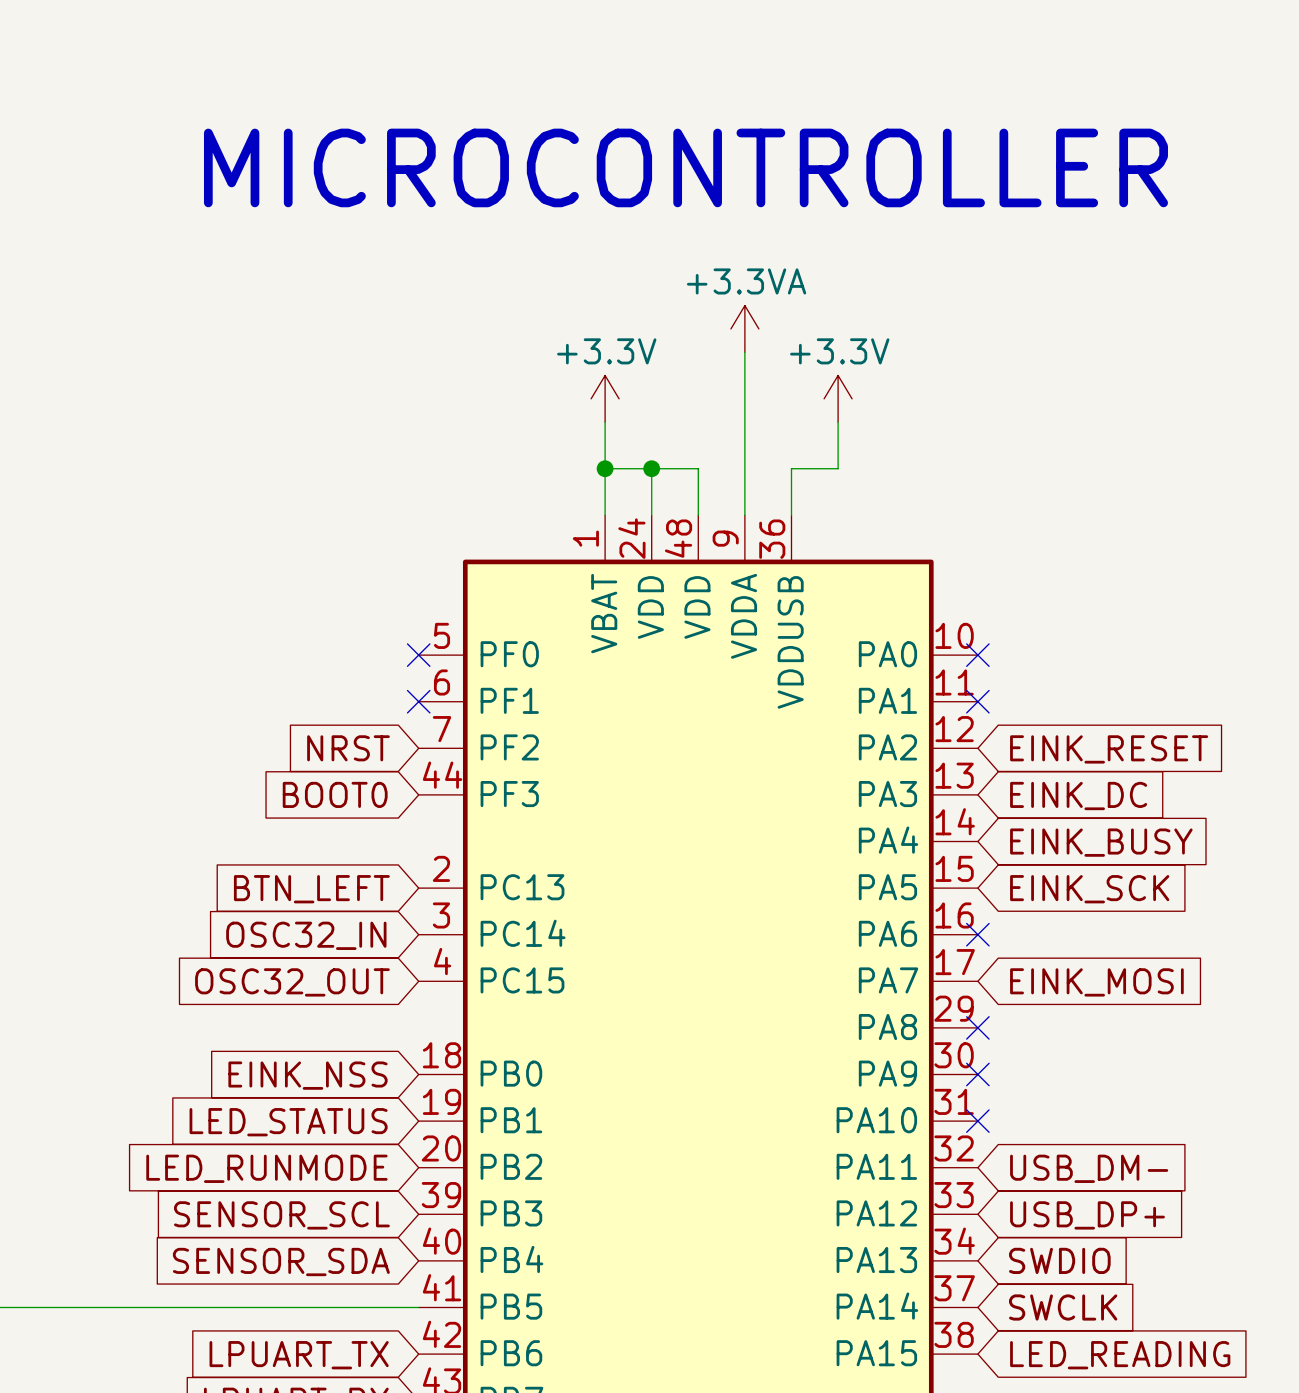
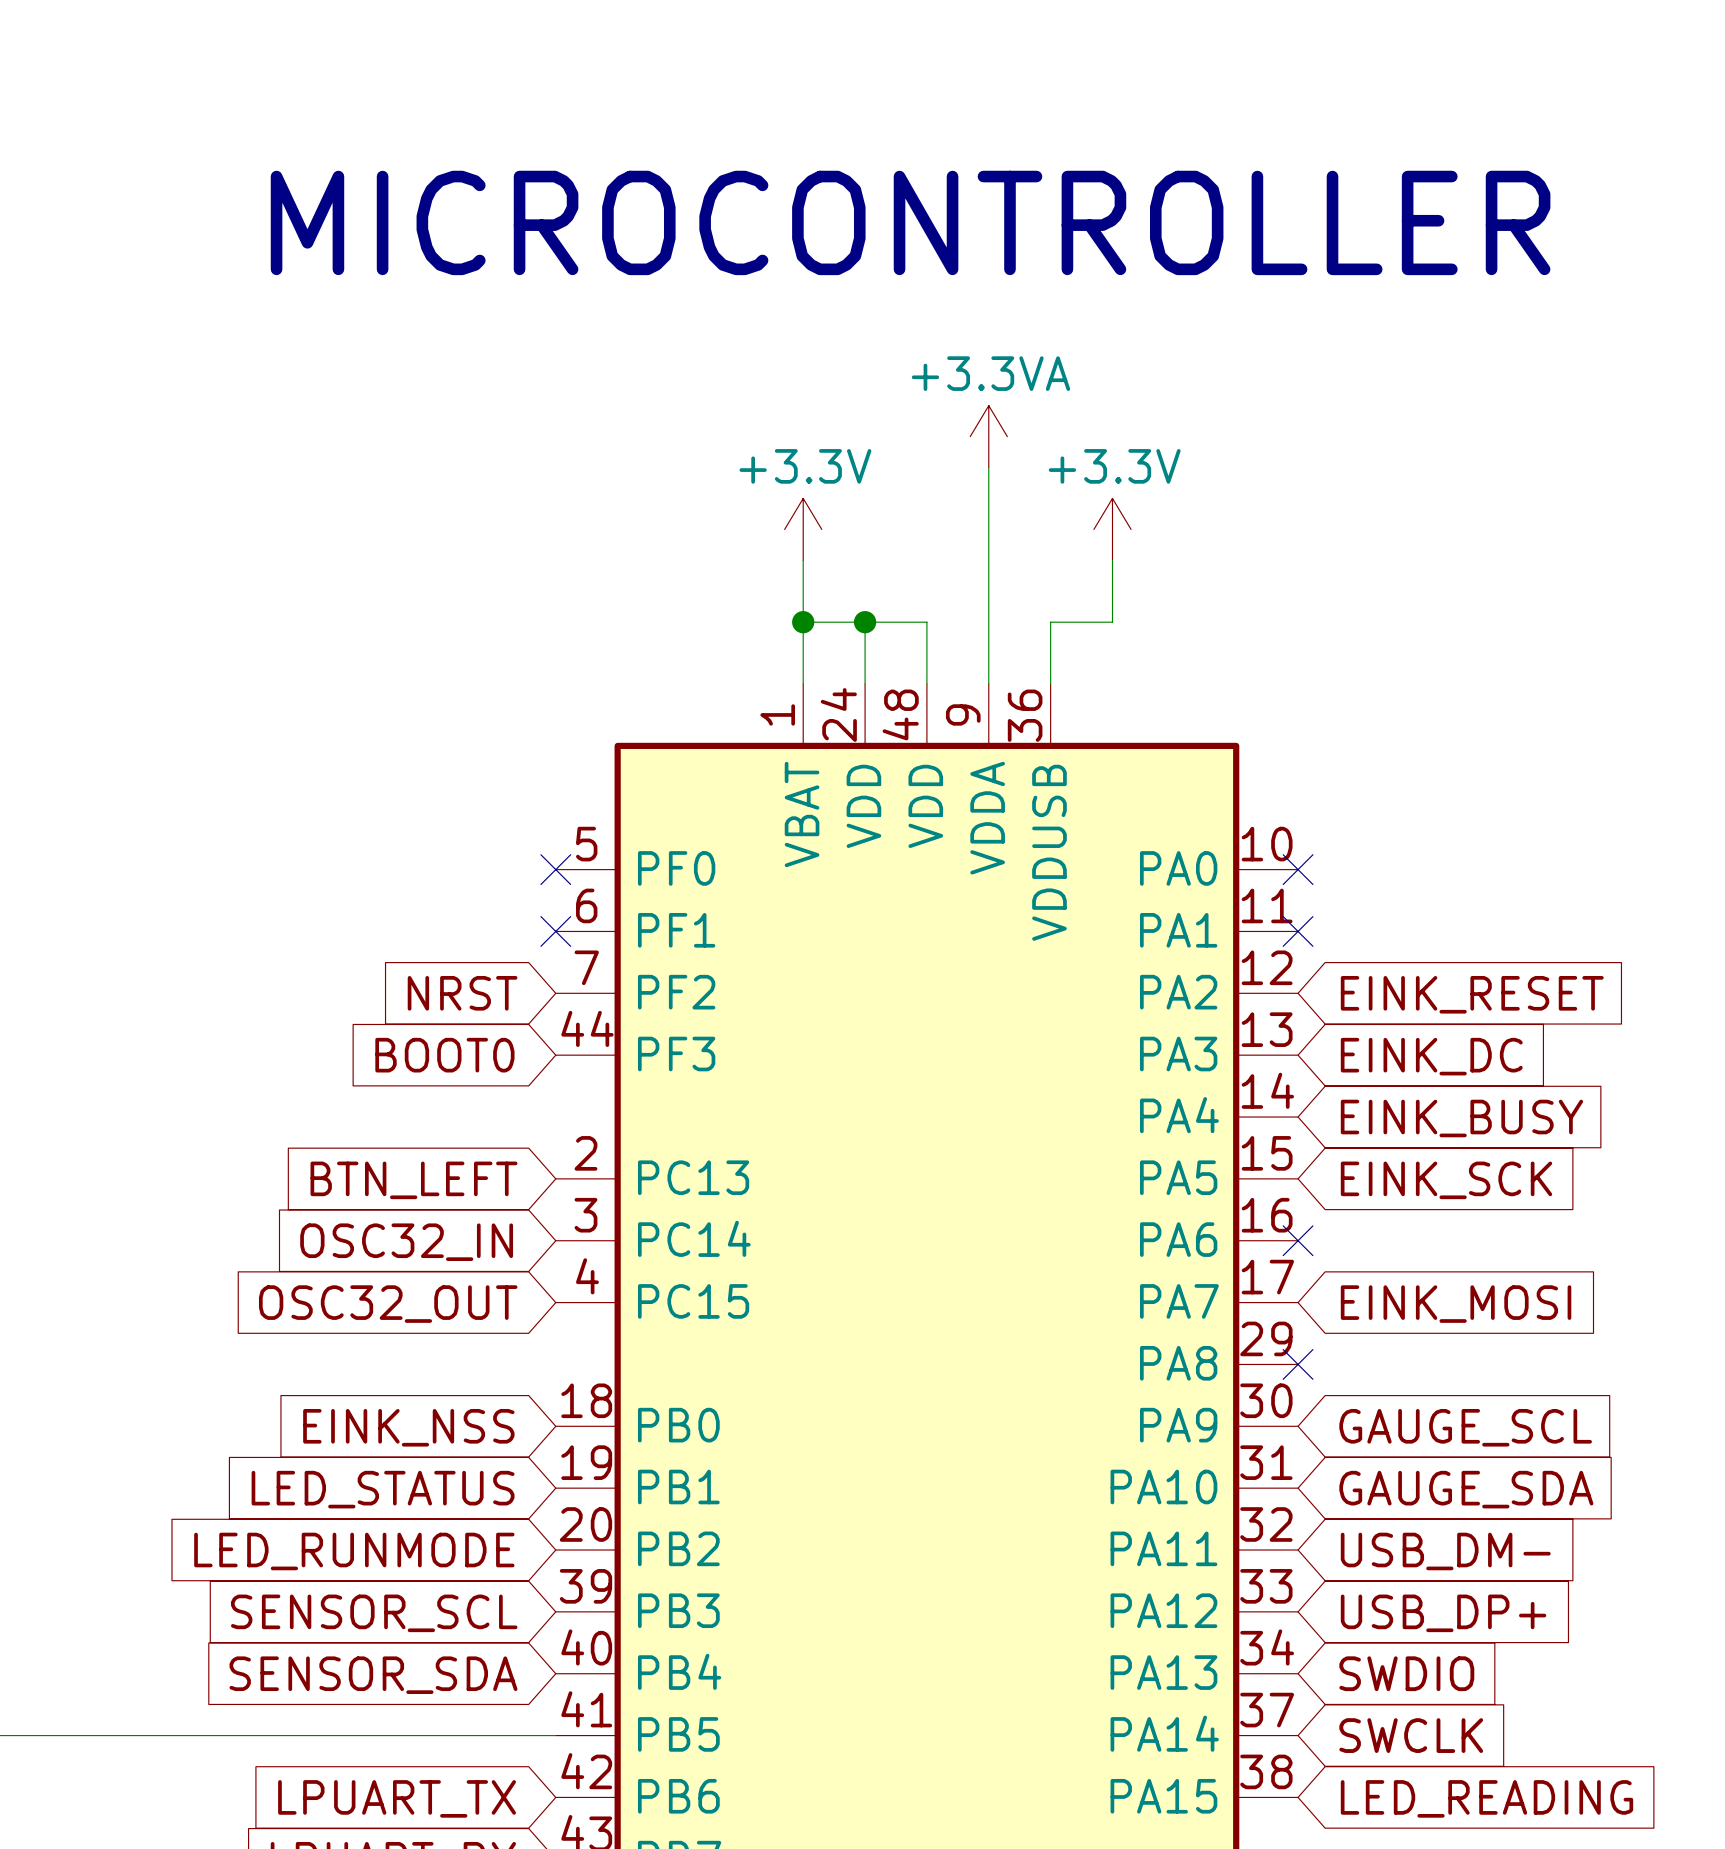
no-connect mark: (977, 1074) -> none
global label: none -> GAUGE_SCL (1465, 1427)
no-connect mark: (977, 1121) -> none
global label: none -> GAUGE_SDA (1466, 1489)

